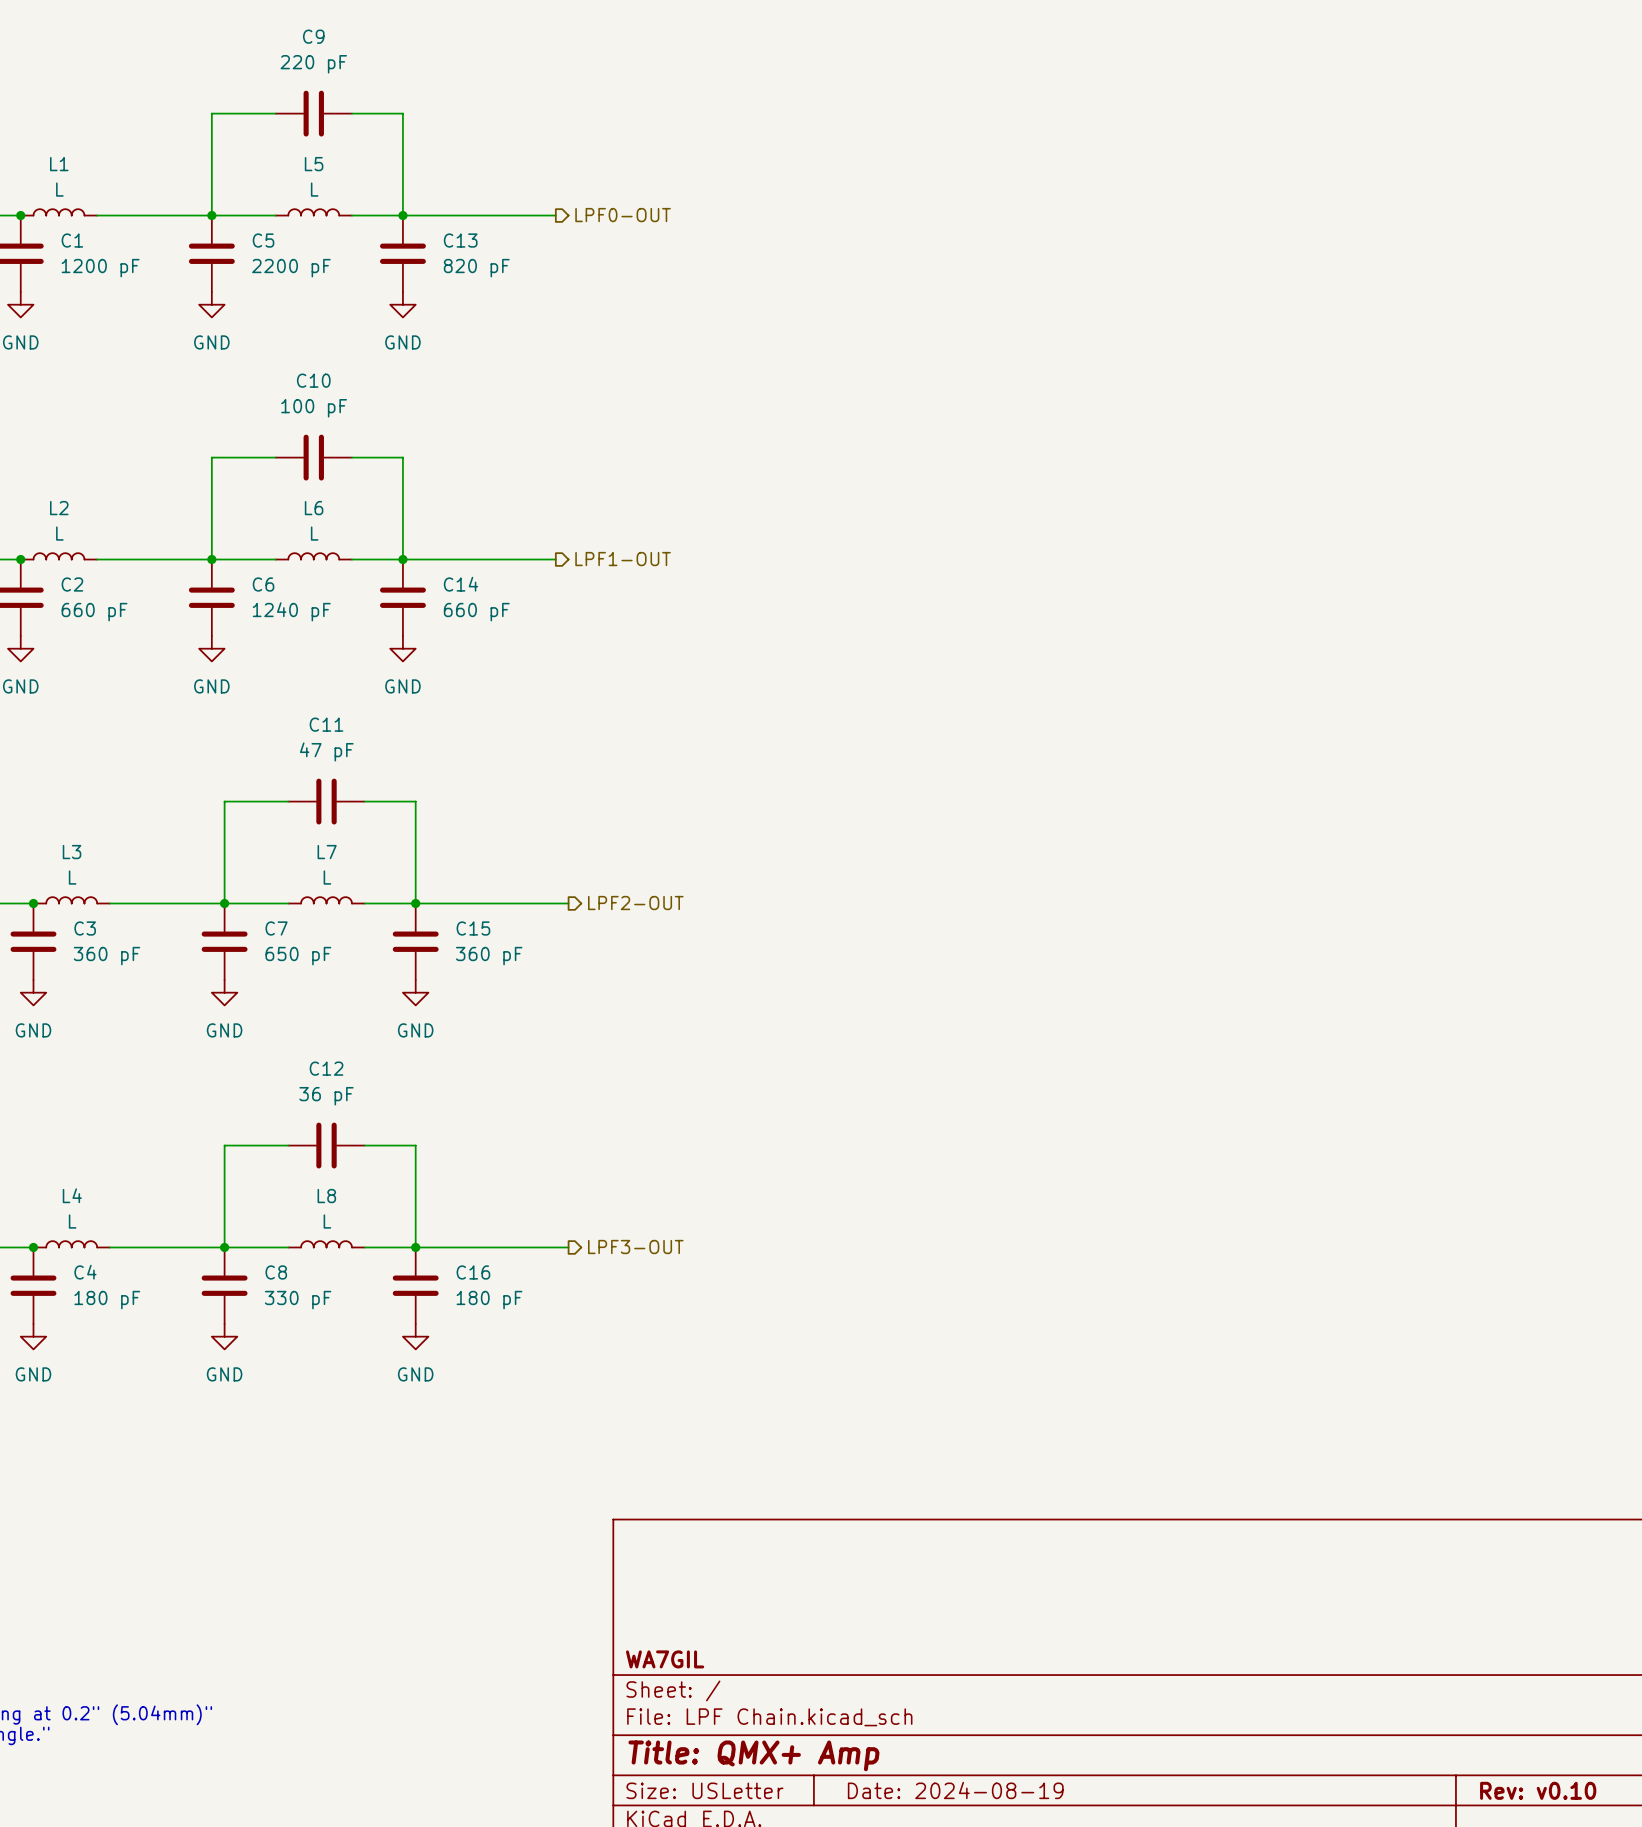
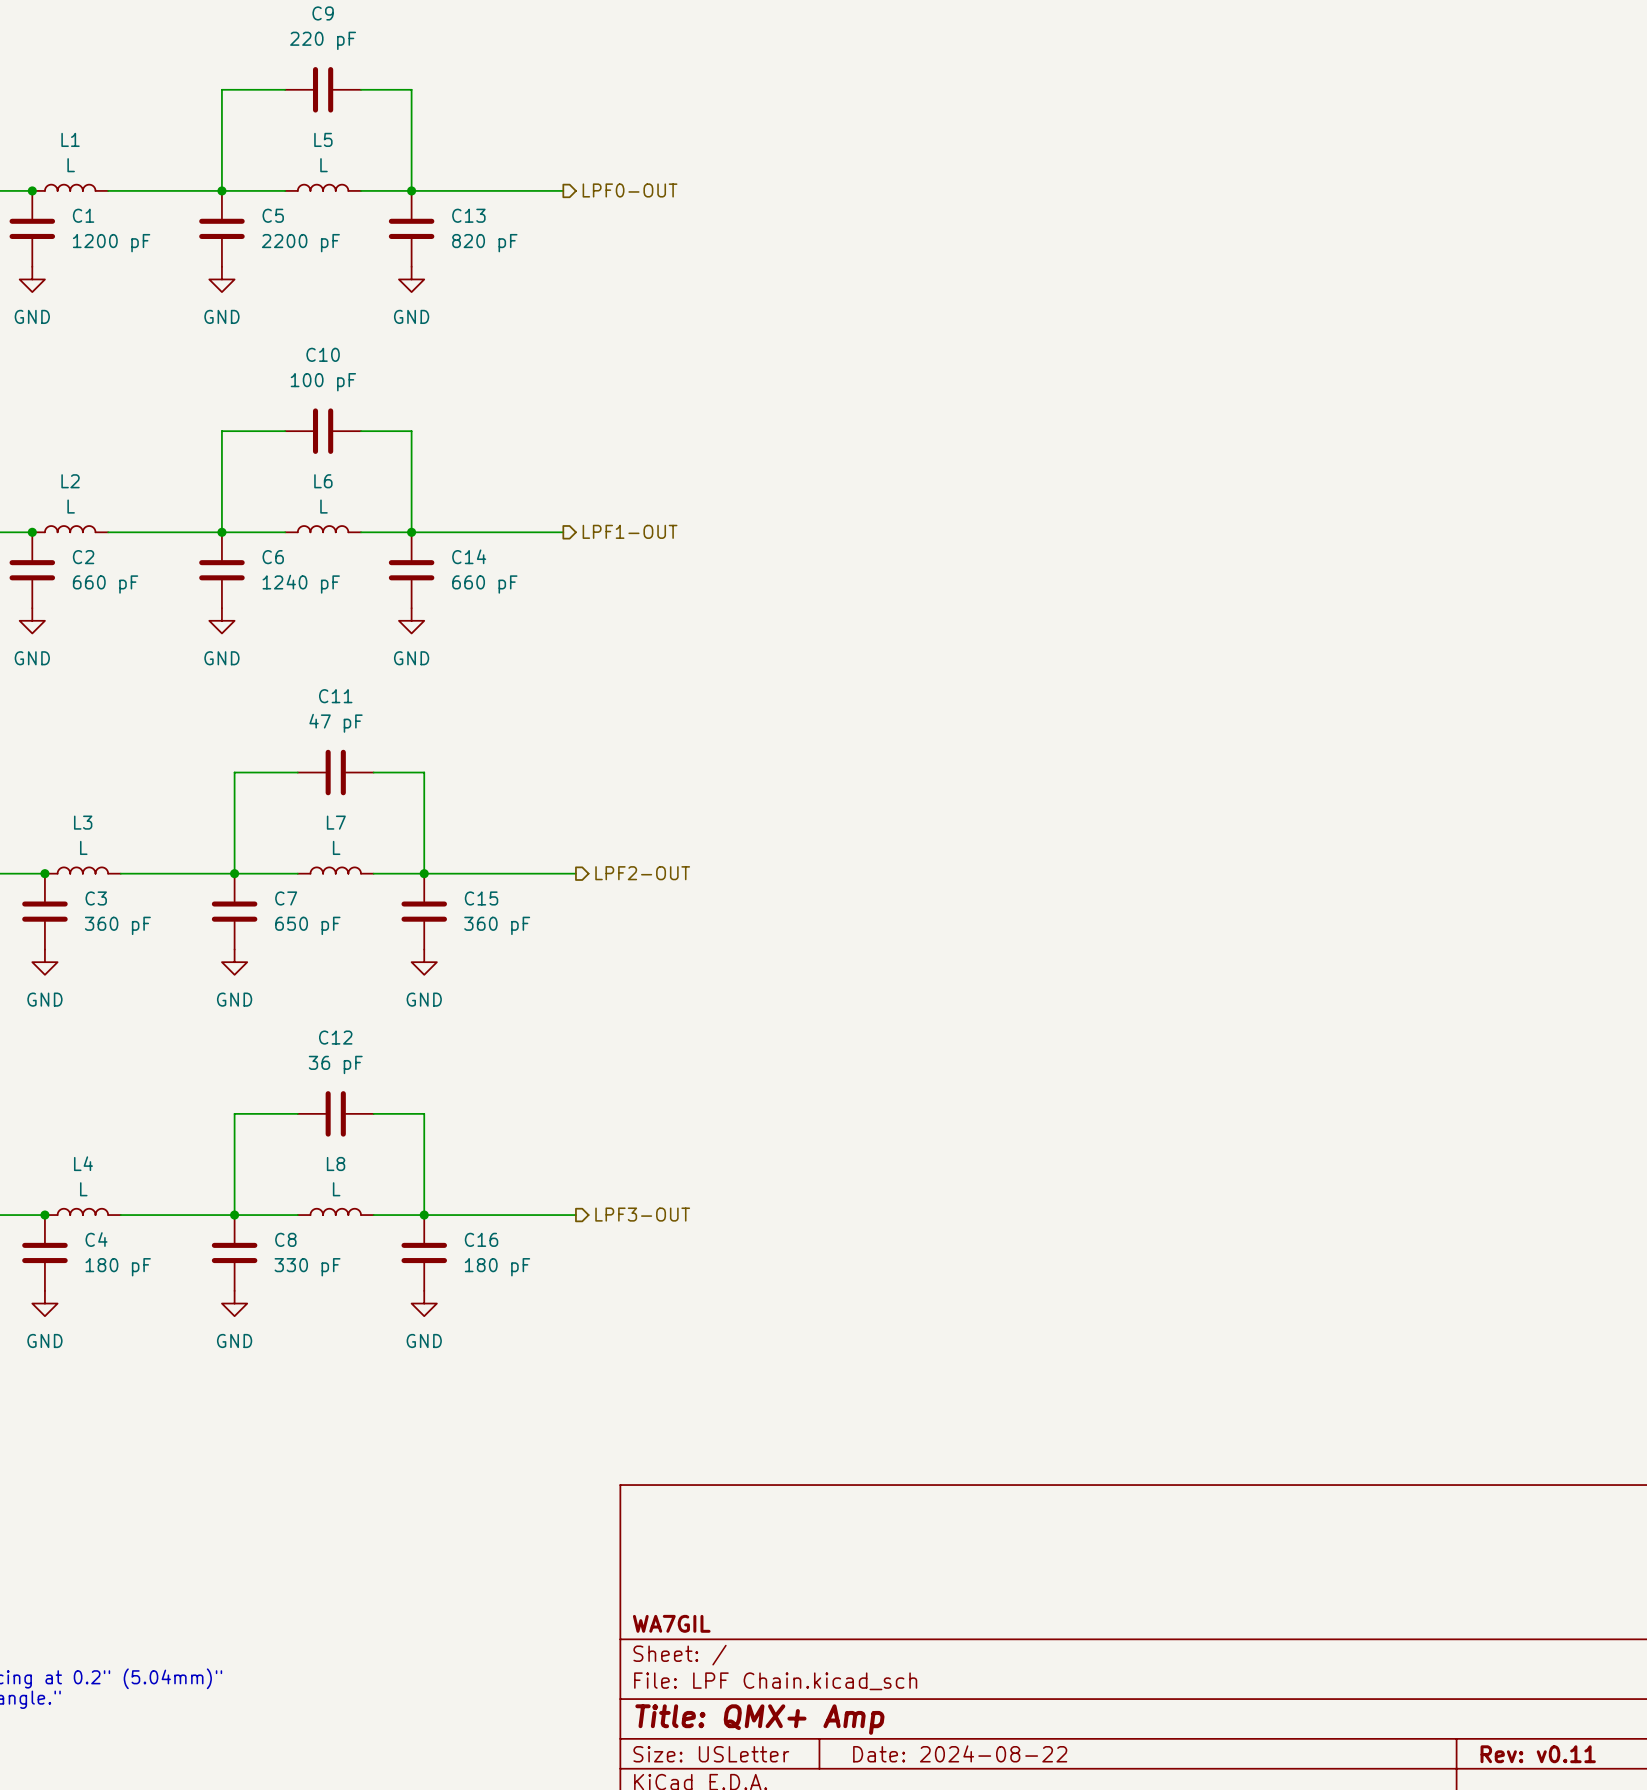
title block: Date: 2024-08-19 (955, 1790) -> Date: 2024-08-22 (960, 1753)
title block: Rev: v0.10 (1538, 1790) -> Rev: v0.11 (1538, 1754)

